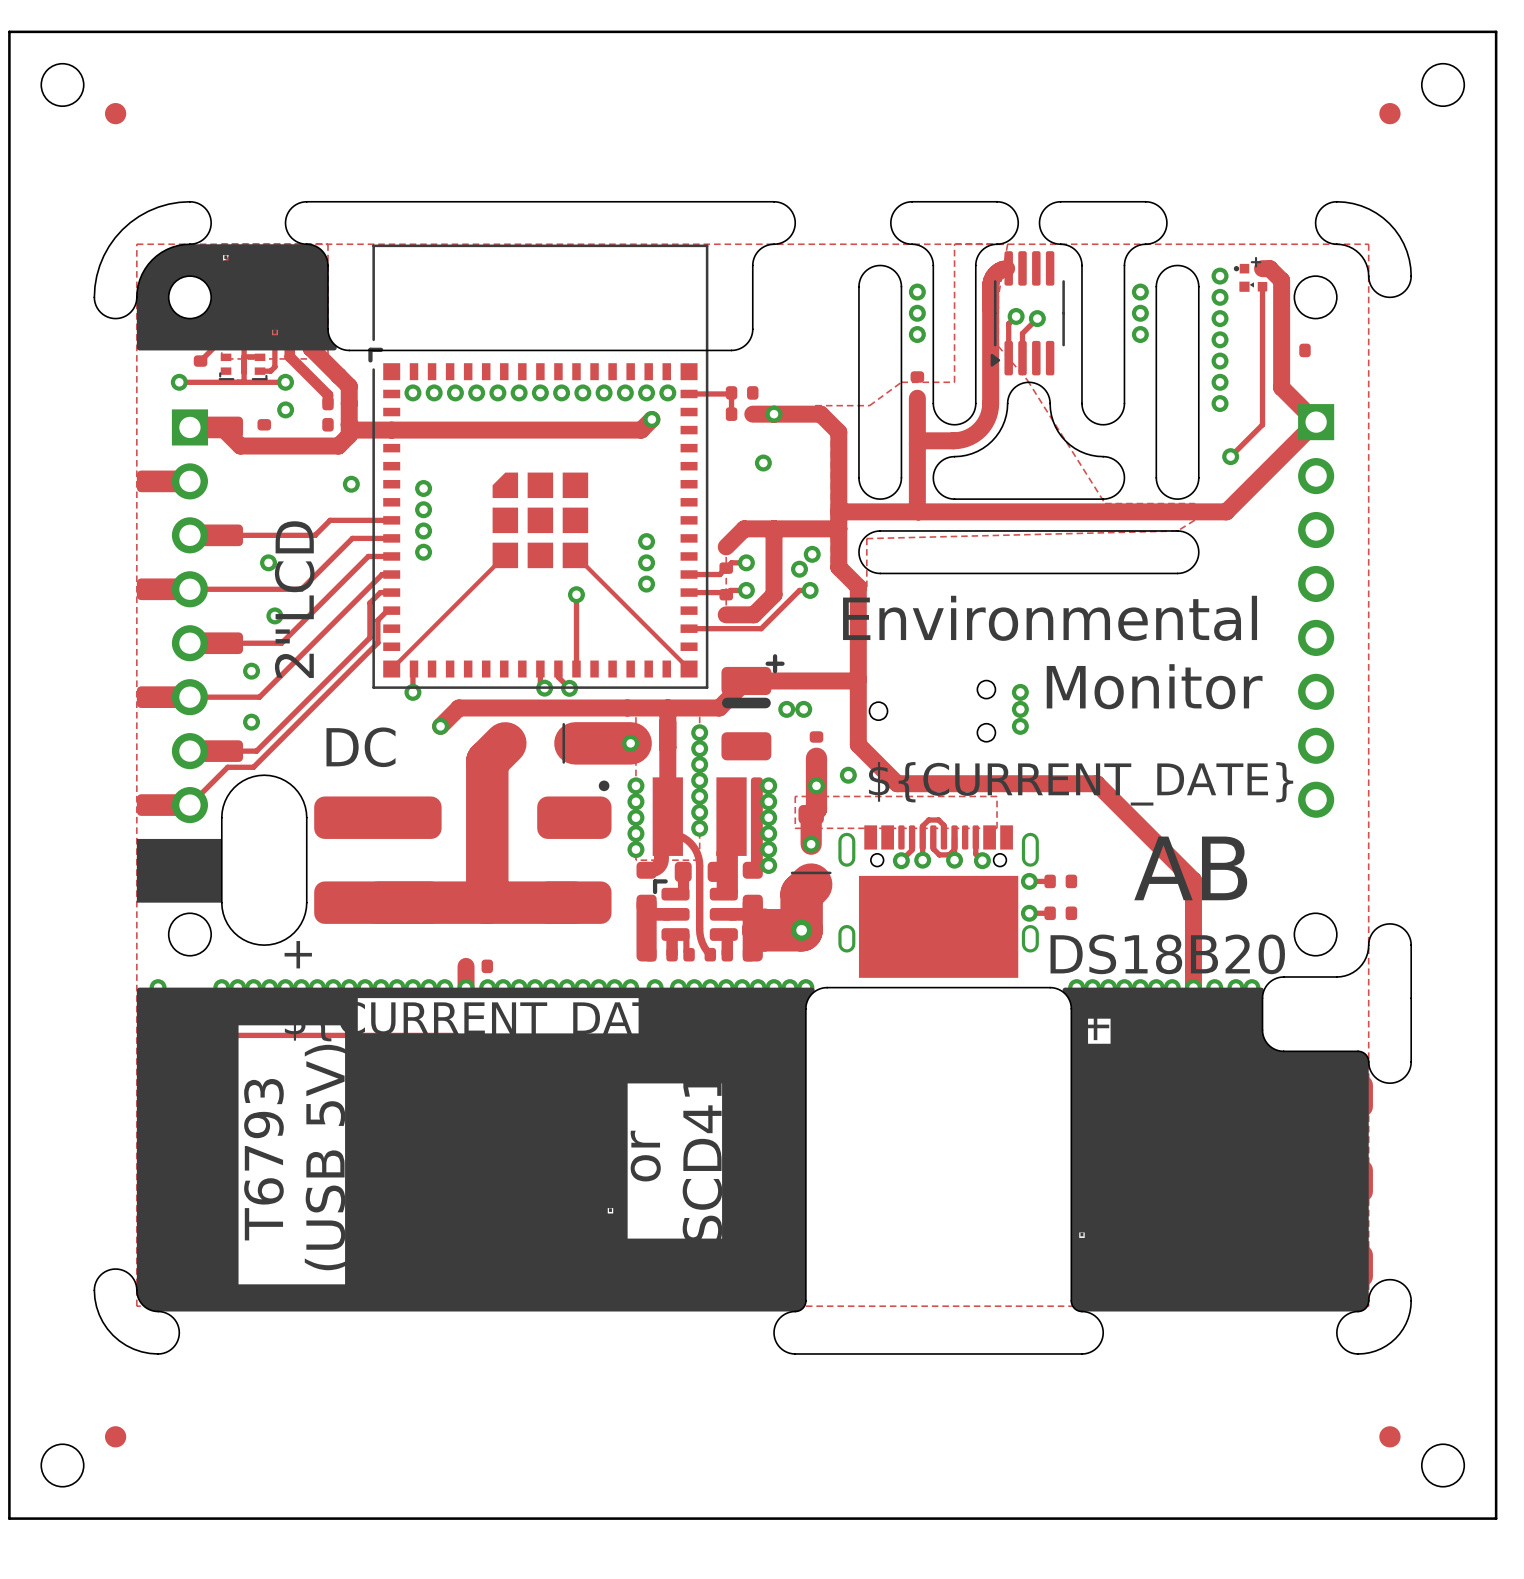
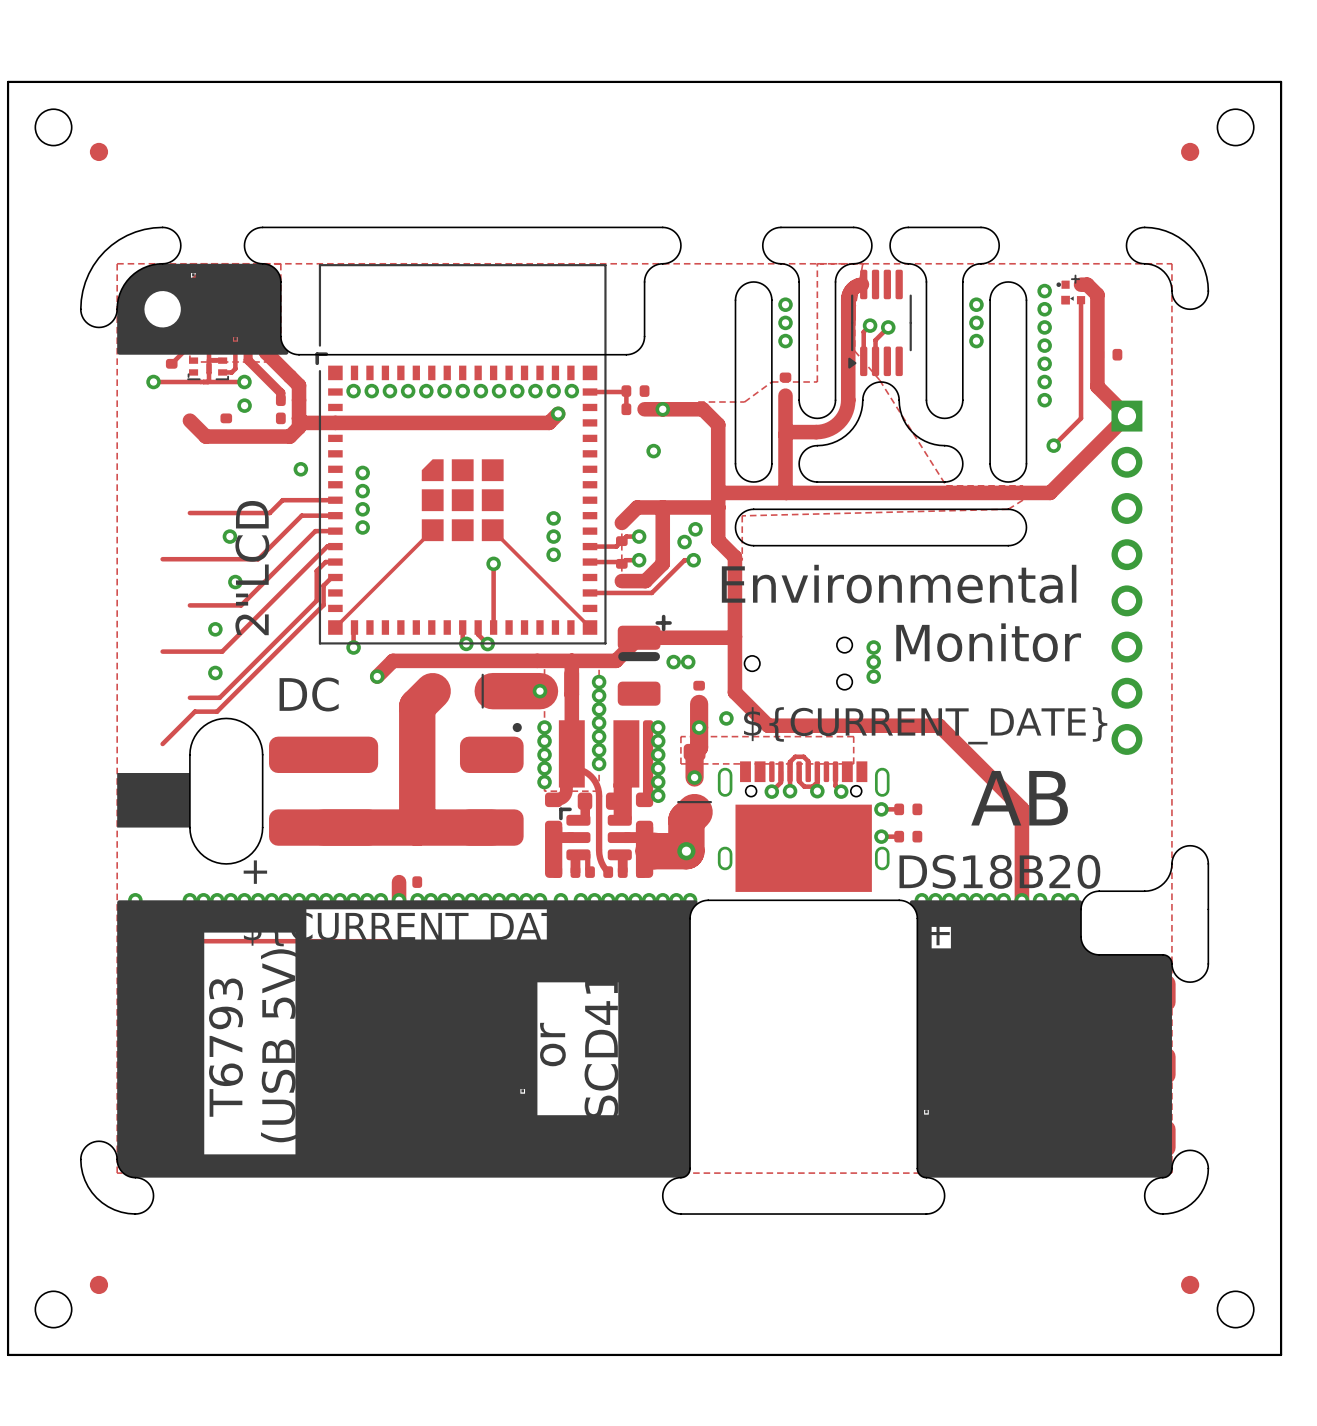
round board edge: [168, 275, 212, 320] -> none
round board edge: [1293, 275, 1338, 320] -> none
part: (189, 616) -> none
round board edge: [168, 912, 212, 957] -> none
round board edge: [1293, 912, 1338, 957] -> none

